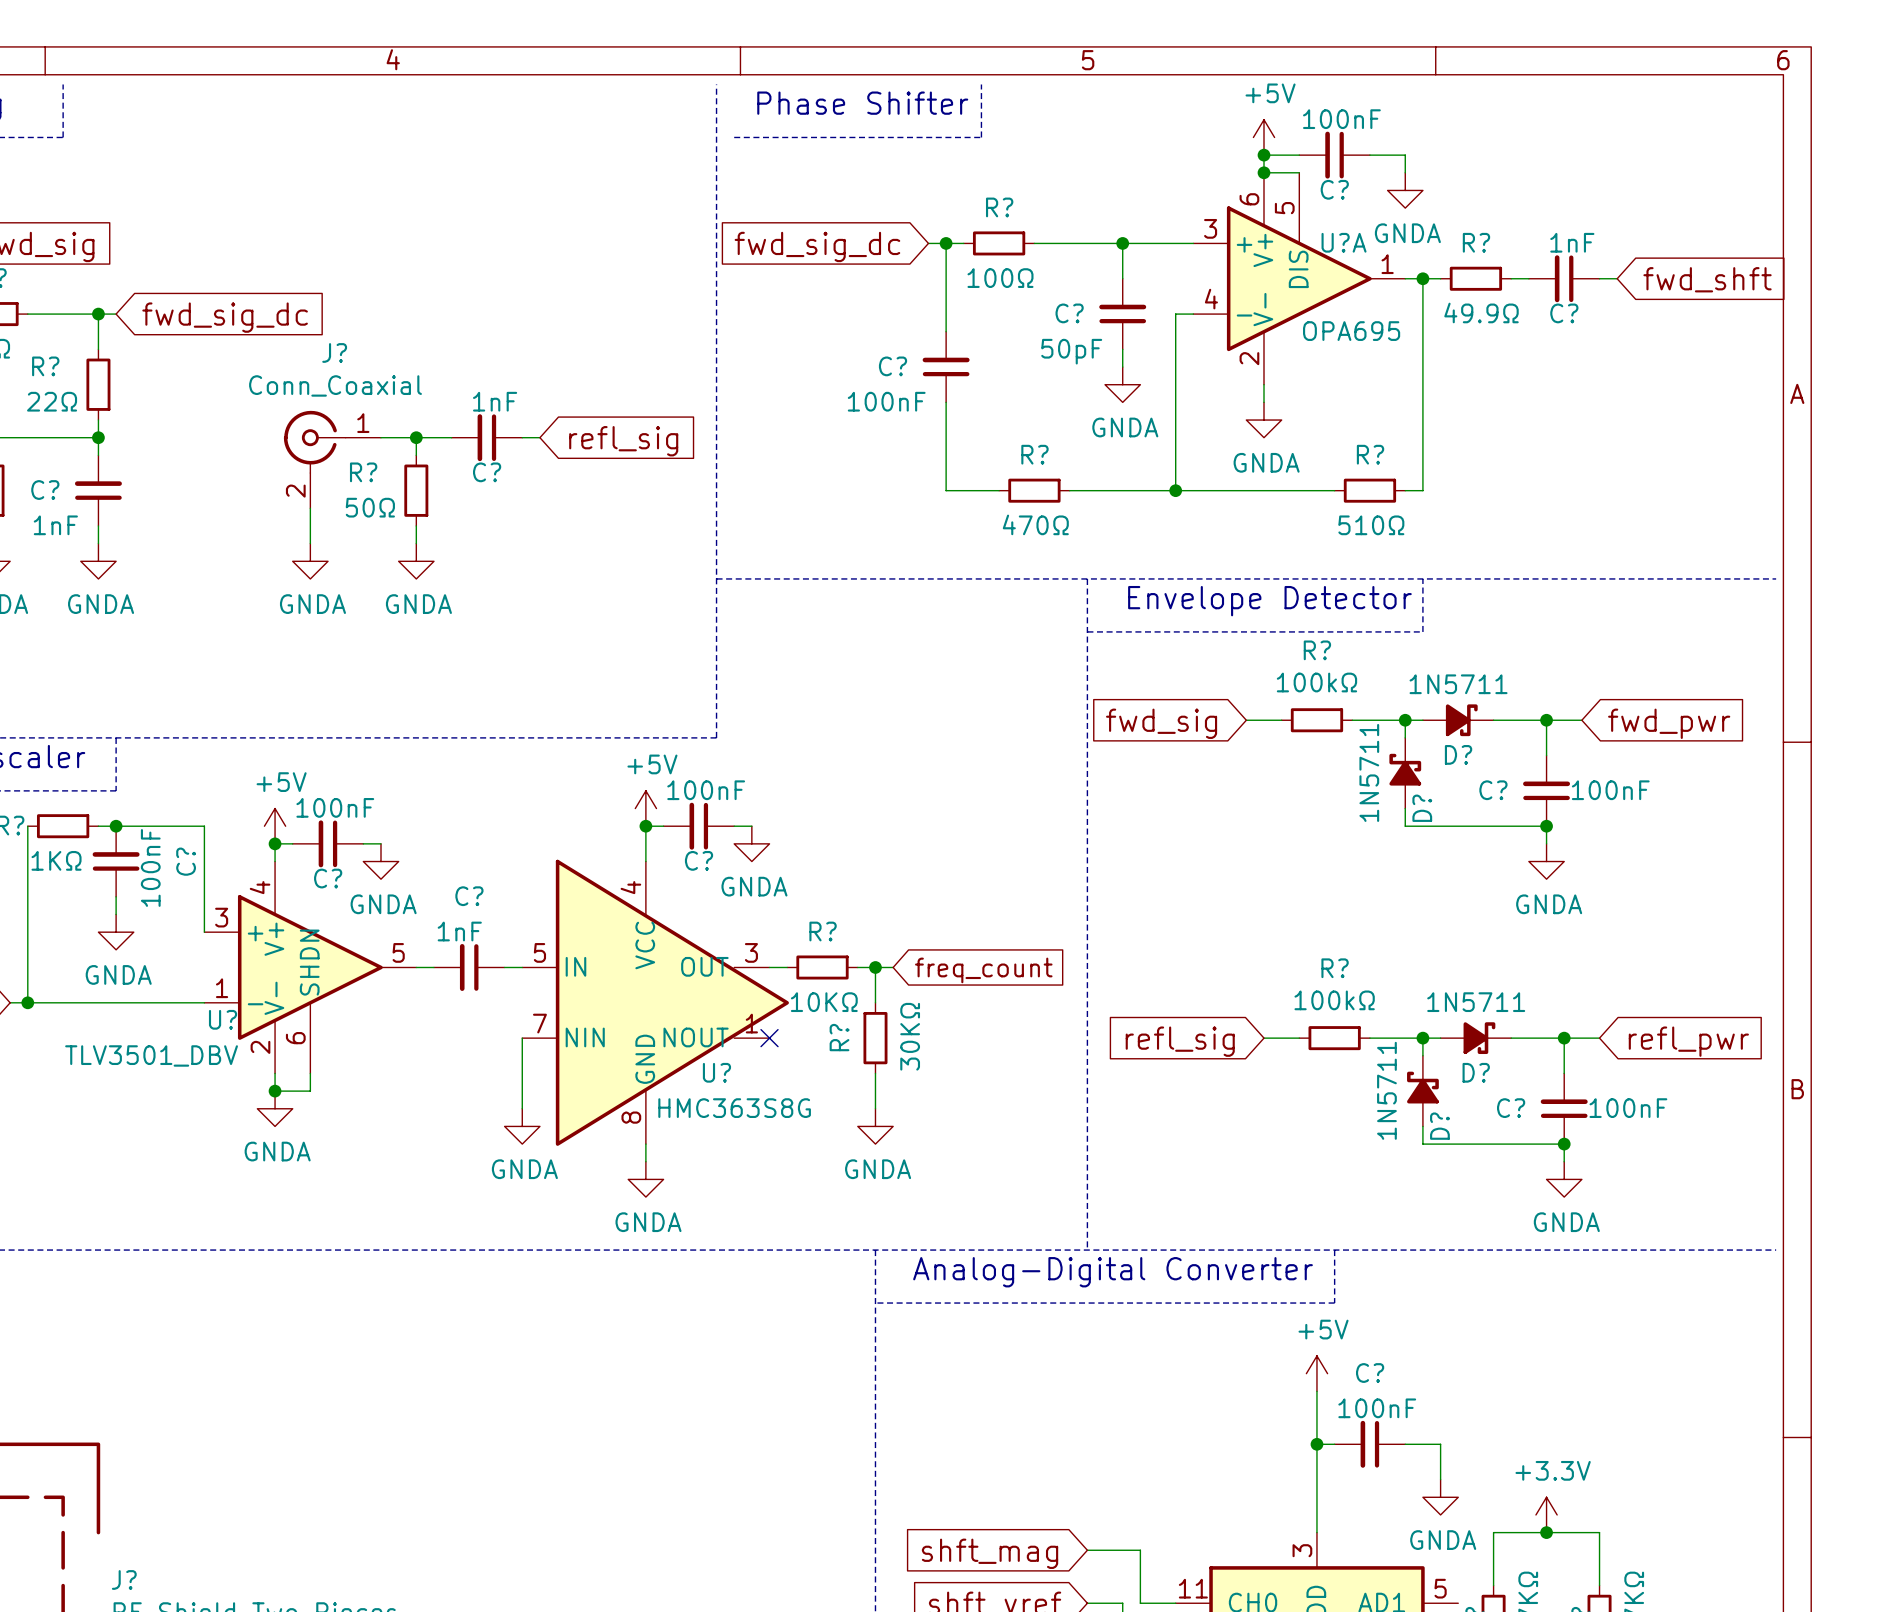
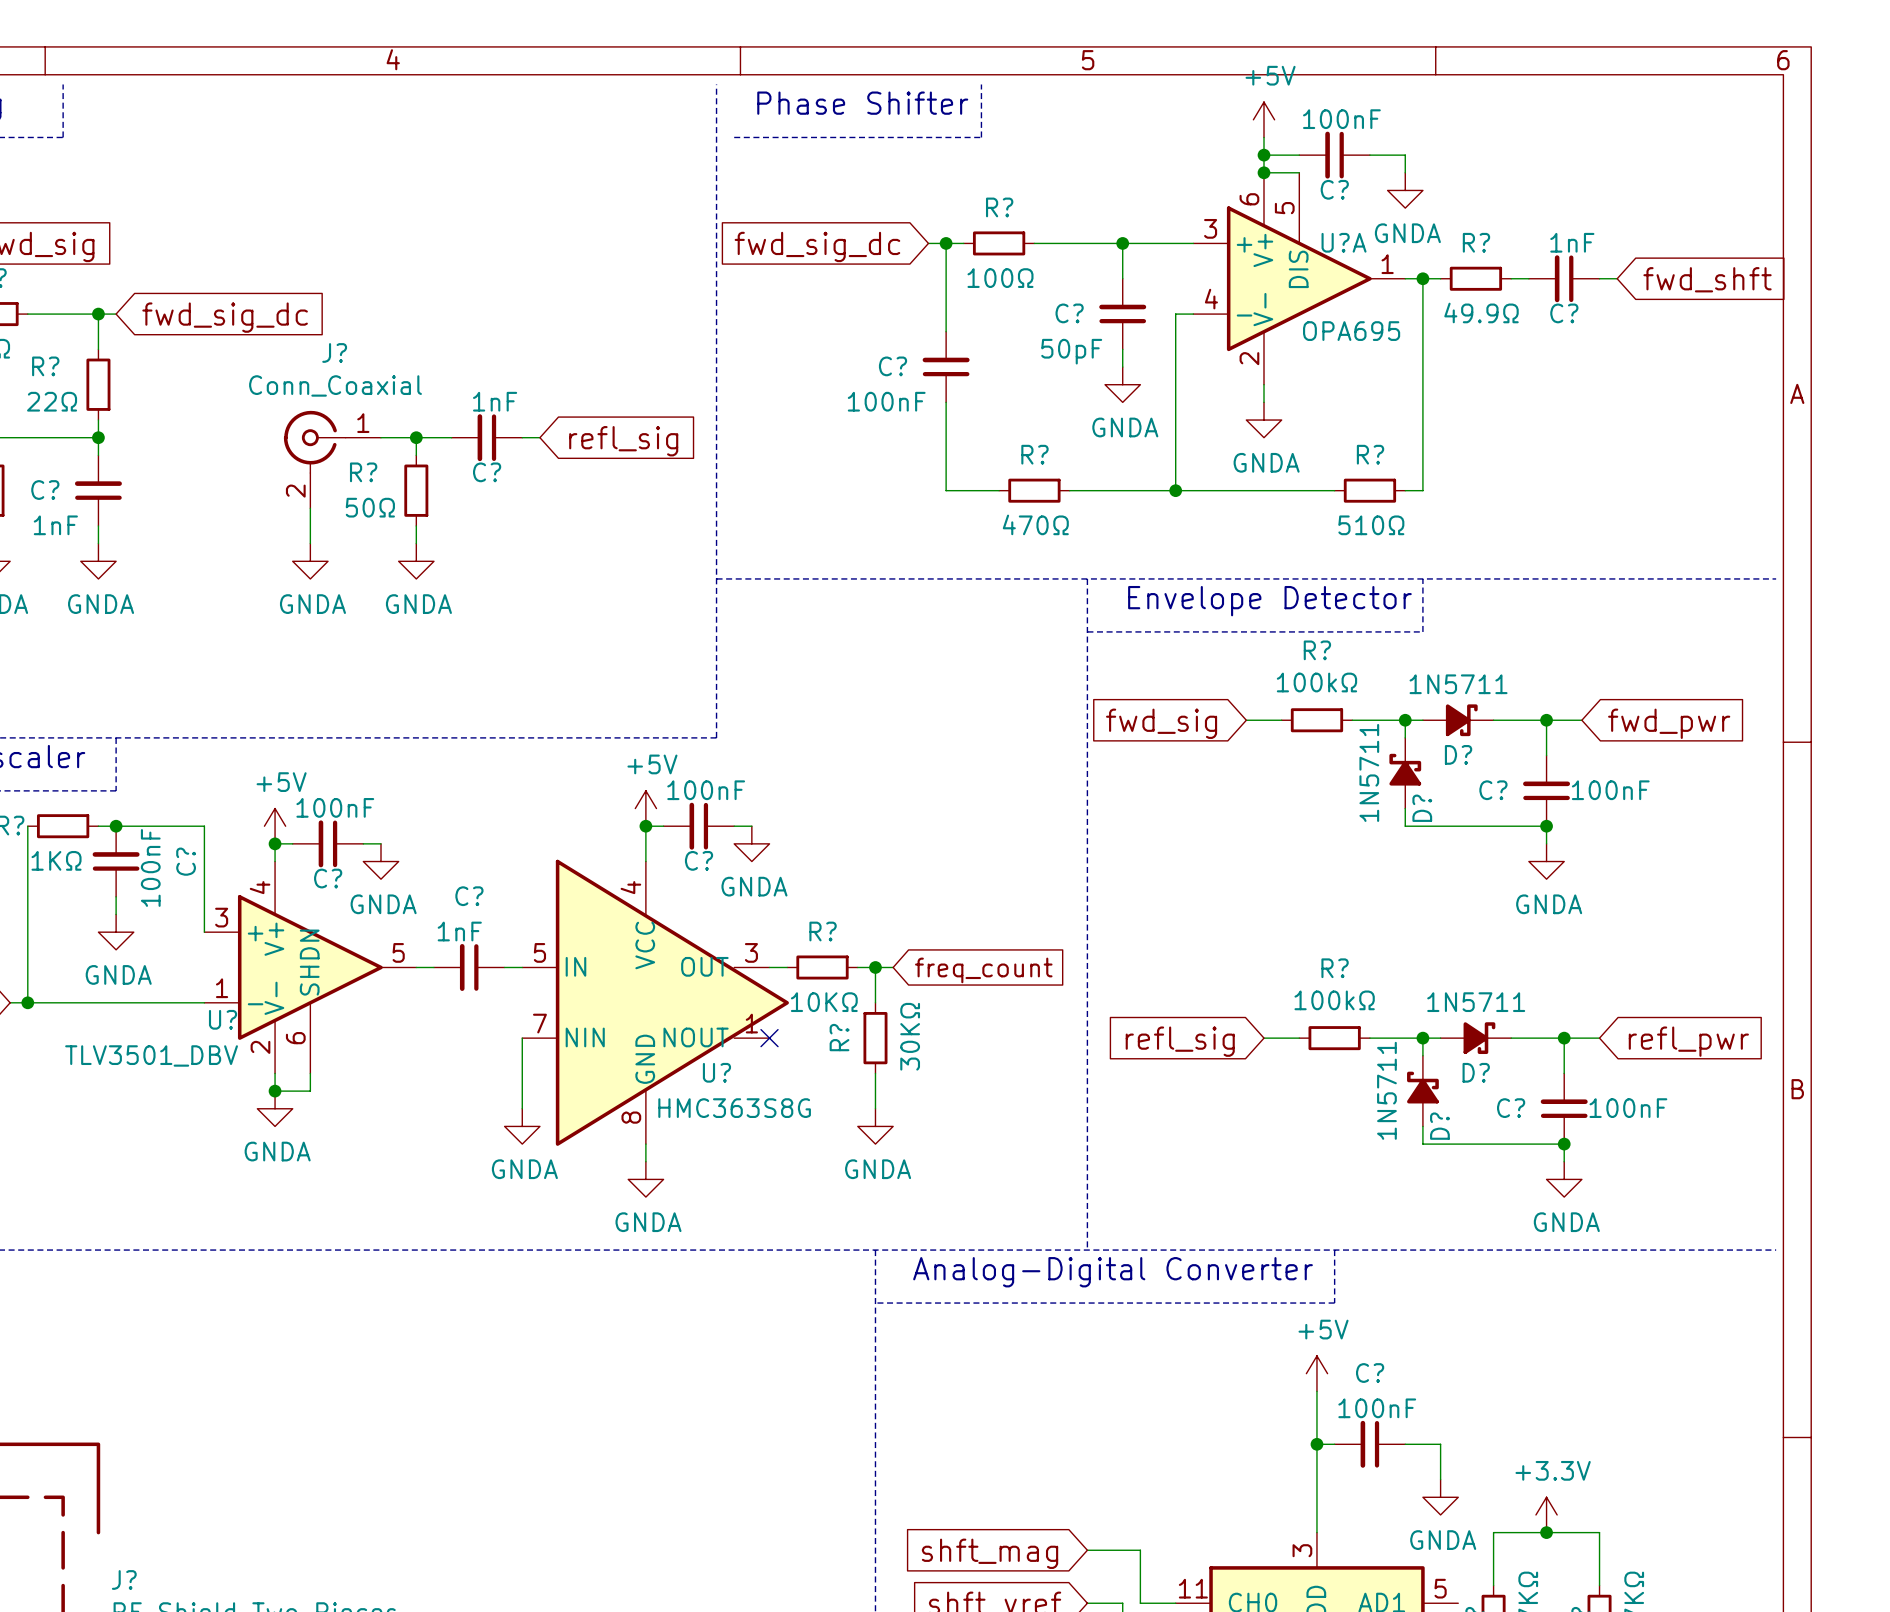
power symbol position: +5V (1263, 137) -> +5V (1263, 119)

